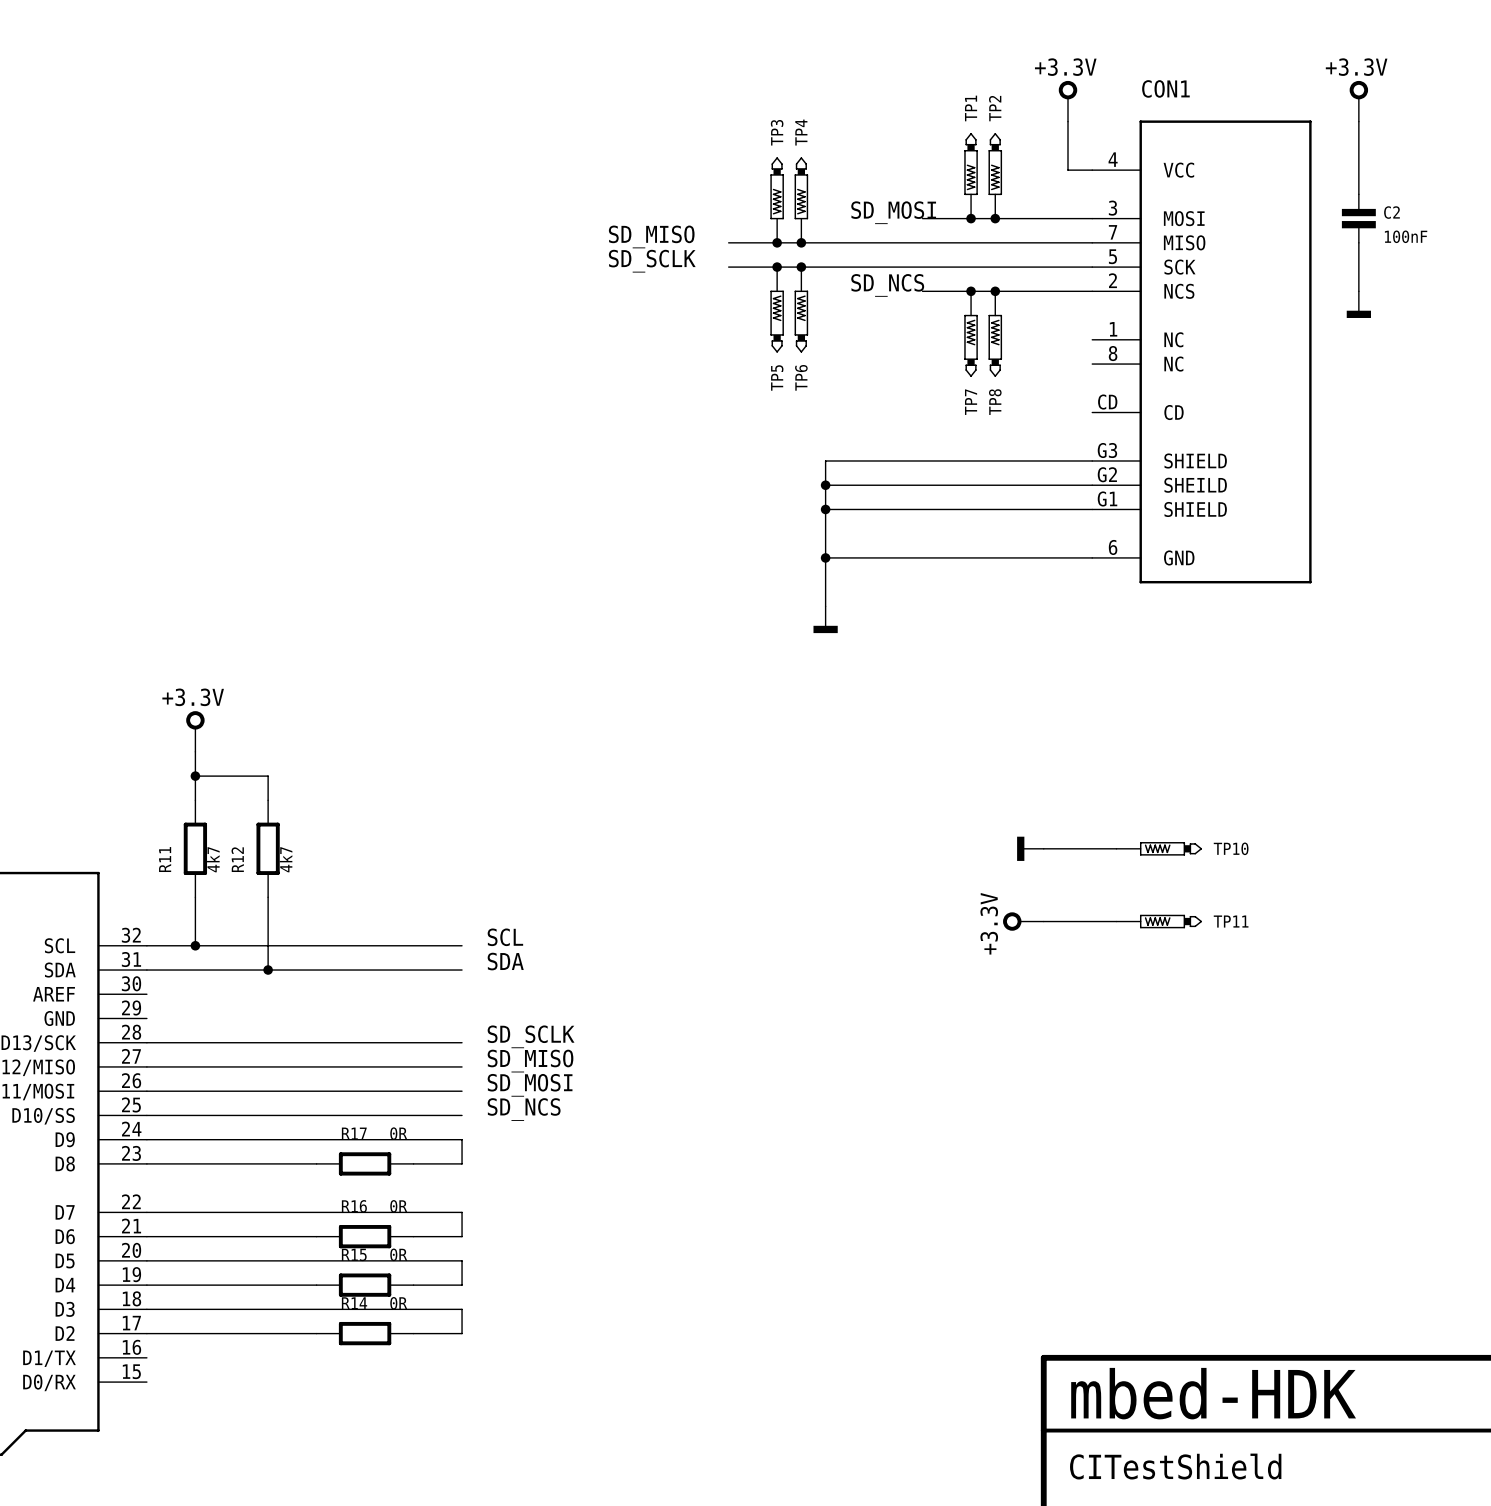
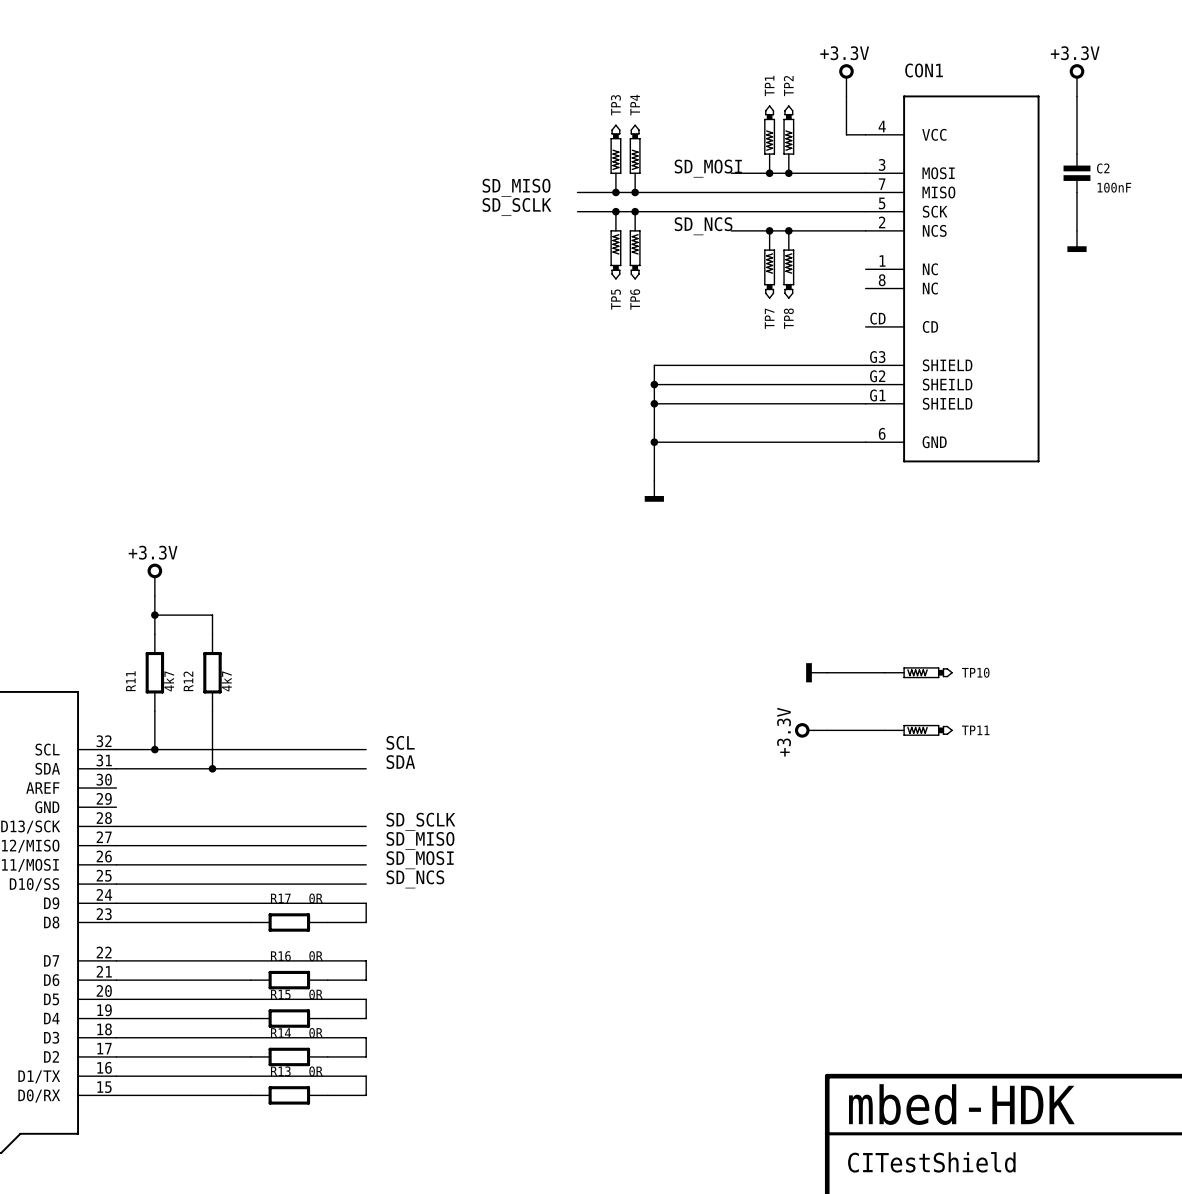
wire: none -> (116, 1076) (366, 1076) (366, 1095) (327, 1095)
wire: none -> (116, 1095) (250, 1095)
R13: none -> 0R (289, 1095)

